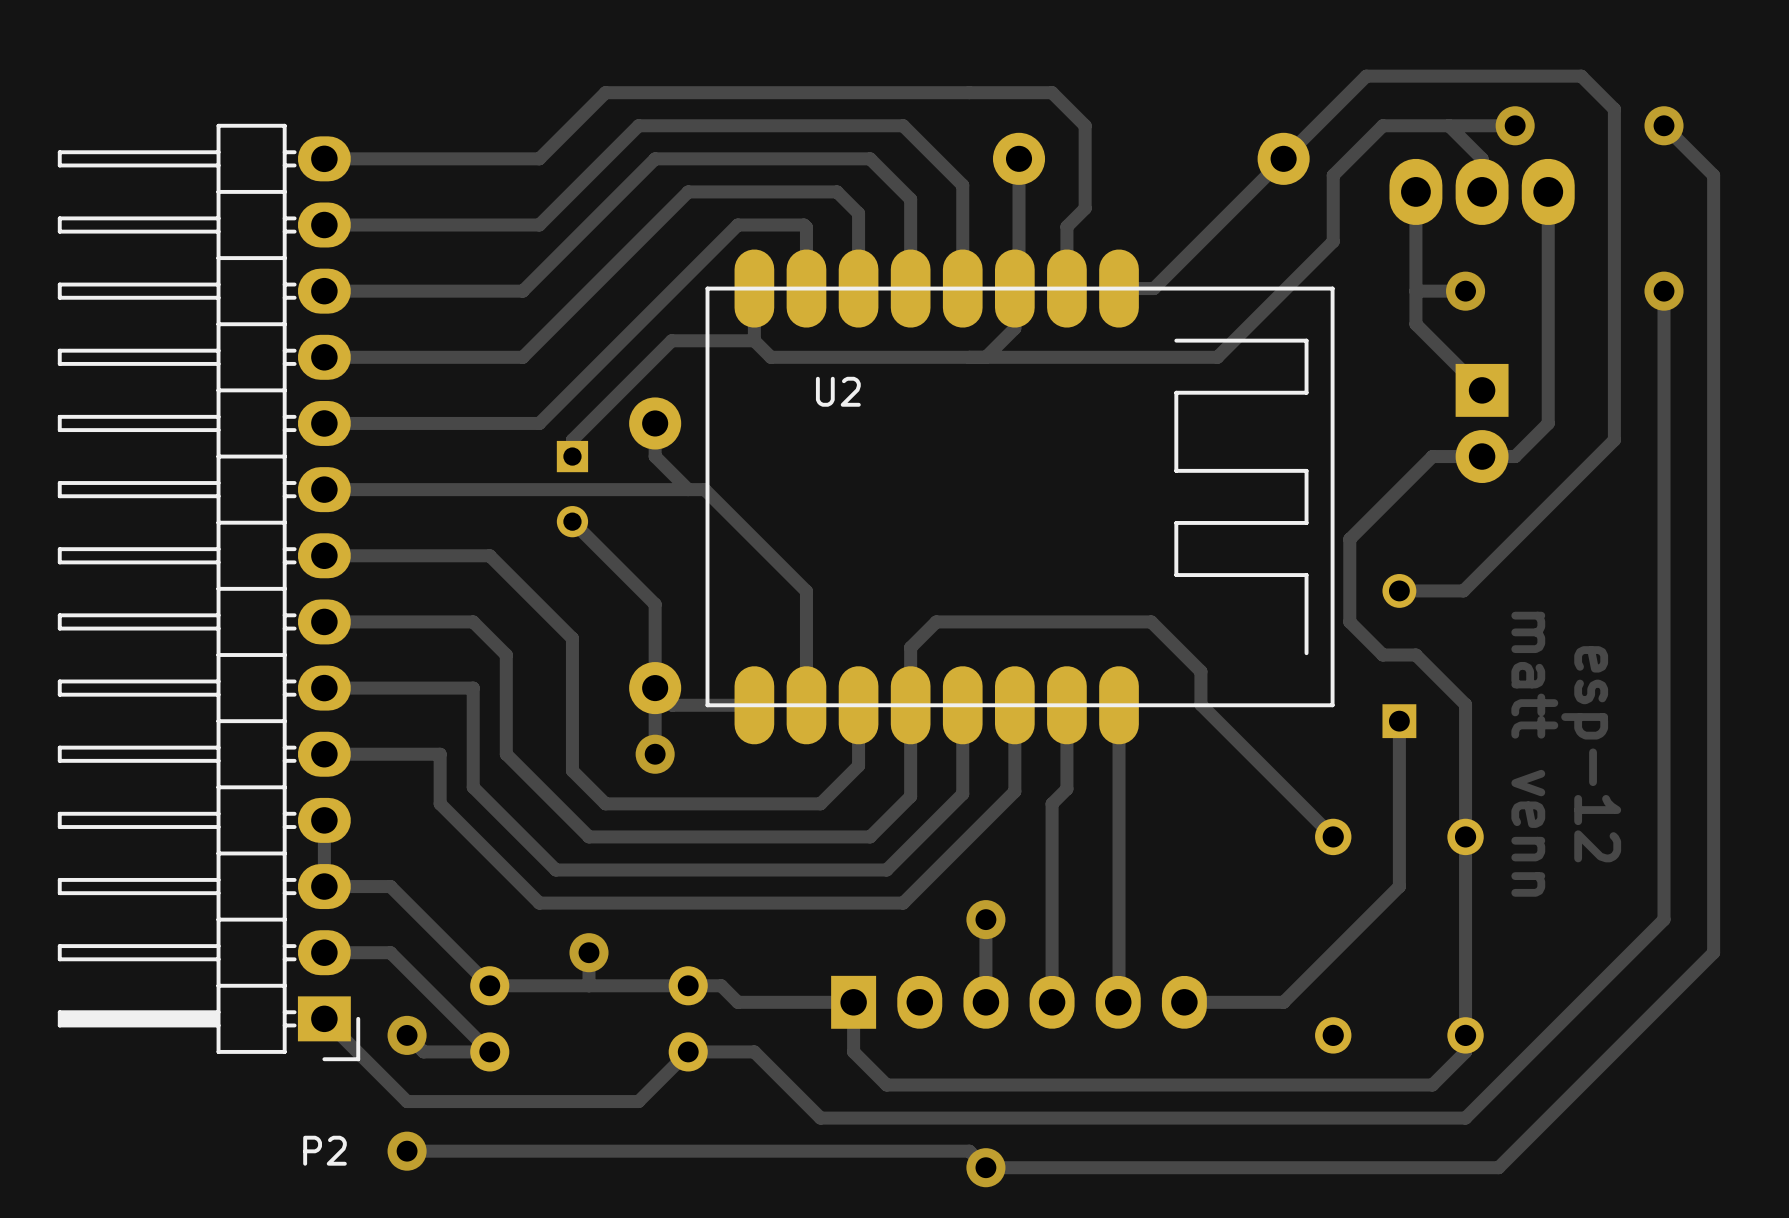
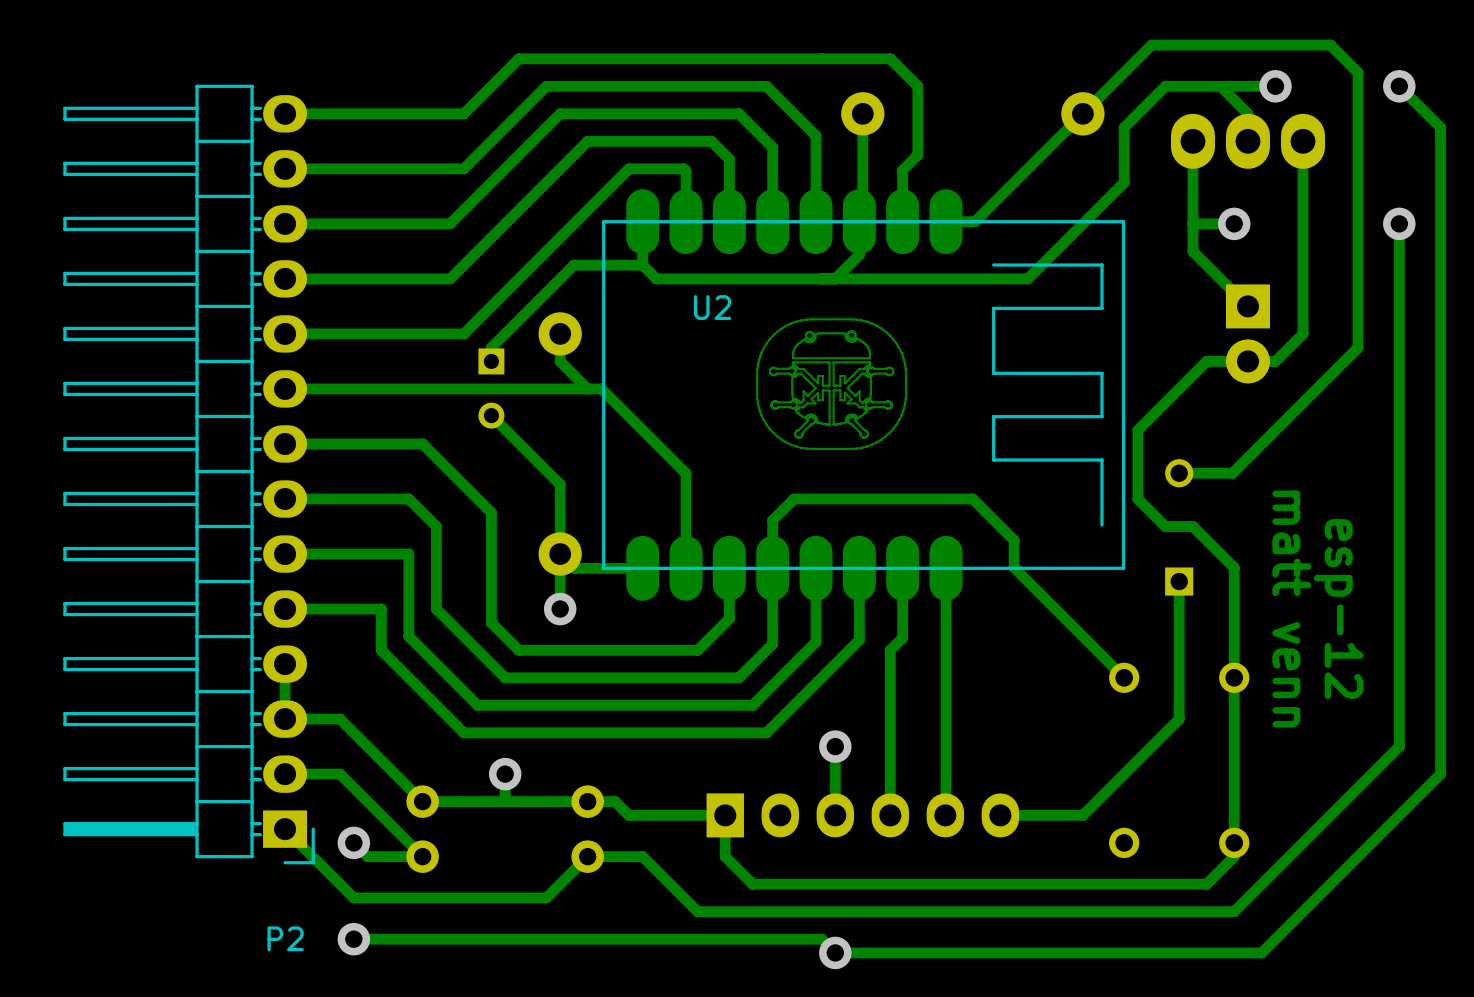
track: none -> (850, 319) (861, 320) (877, 325) (889, 335) (899, 348) (904, 363) (906, 374) (905, 399) (899, 419) (893, 428) (881, 439) (861, 447) (806, 448) (786, 442) (777, 436) (766, 424) (758, 404) (757, 369) (763, 348) (777, 331) (795, 321) (812, 319) (850, 319)
track: none -> (852, 331) (847, 334) (850, 338) (855, 335) (852, 331)
track: none -> (809, 331) (806, 335) (809, 339) (813, 335) (809, 331)
track: none -> (840, 333) (815, 334) (813, 340) (809, 342) (804, 339) (794, 347) (793, 358) (870, 358) (869, 349) (864, 343) (856, 338) (853, 341) (849, 341) (845, 337) (845, 333) (840, 333)
track: none -> (793, 362) (829, 362) (829, 385) (822, 385) (822, 376) (818, 376) (818, 383) (803, 368) (798, 368) (793, 365) (793, 362)
track: none -> (869, 362) (833, 362) (833, 385) (840, 385) (840, 376) (845, 376) (845, 383) (859, 368) (864, 368) (869, 365) (869, 362)
track: none -> (792, 367) (795, 371) (792, 374) (772, 375) (770, 372) (772, 367) (792, 367)
track: none -> (871, 367) (890, 367) (893, 372) (890, 375) (870, 374) (867, 370) (871, 367)
track: none -> (792, 377) (801, 373) (815, 388) (807, 395) (803, 391) (803, 400) (801, 402) (792, 398) (792, 377)
track: none -> (870, 377) (870, 398) (862, 402) (859, 400) (859, 391) (855, 395) (847, 388) (862, 373) (870, 377)
track: none -> (794, 401) (797, 404) (794, 408) (774, 408) (771, 405) (774, 401) (794, 401)
track: none -> (870, 401) (888, 401) (891, 405) (888, 408) (868, 408) (866, 403) (870, 401)
track: none -> (811, 416) (796, 431) (796, 436) (801, 436) (802, 433) (814, 423) (814, 418) (811, 416)
track: none -> (851, 416) (848, 418) (849, 423) (860, 433) (861, 436) (866, 436) (867, 431) (851, 416)
track: none -> (829, 424) (817, 422) (816, 418) (813, 415) (809, 414) (805, 418) (795, 410) (807, 403) (815, 403) (811, 399) (818, 392) (818, 400) (822, 400) (822, 390) (829, 390) (829, 424)
track: none -> (833, 424) (846, 422) (846, 418) (849, 415) (853, 414) (857, 418) (867, 410) (855, 403) (847, 403) (851, 399) (845, 392) (845, 400) (840, 400) (840, 390) (833, 390) (833, 424)

